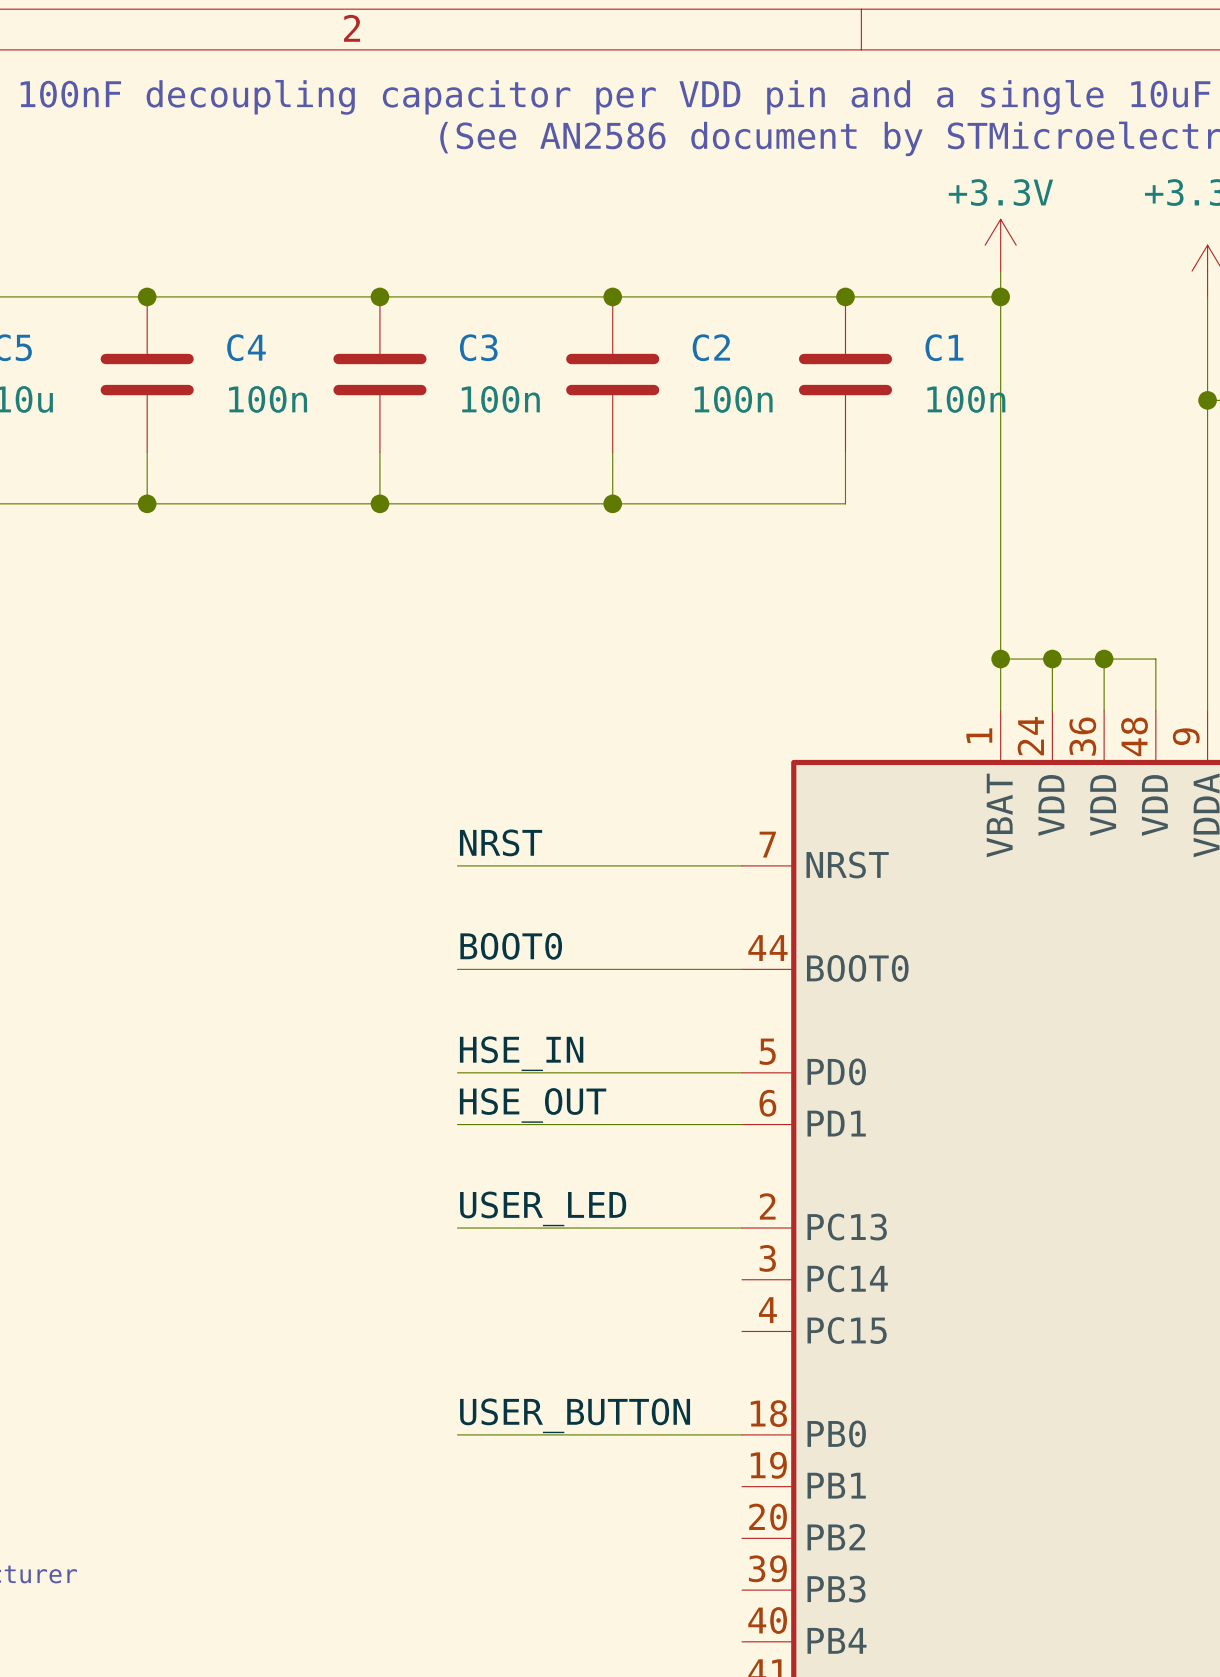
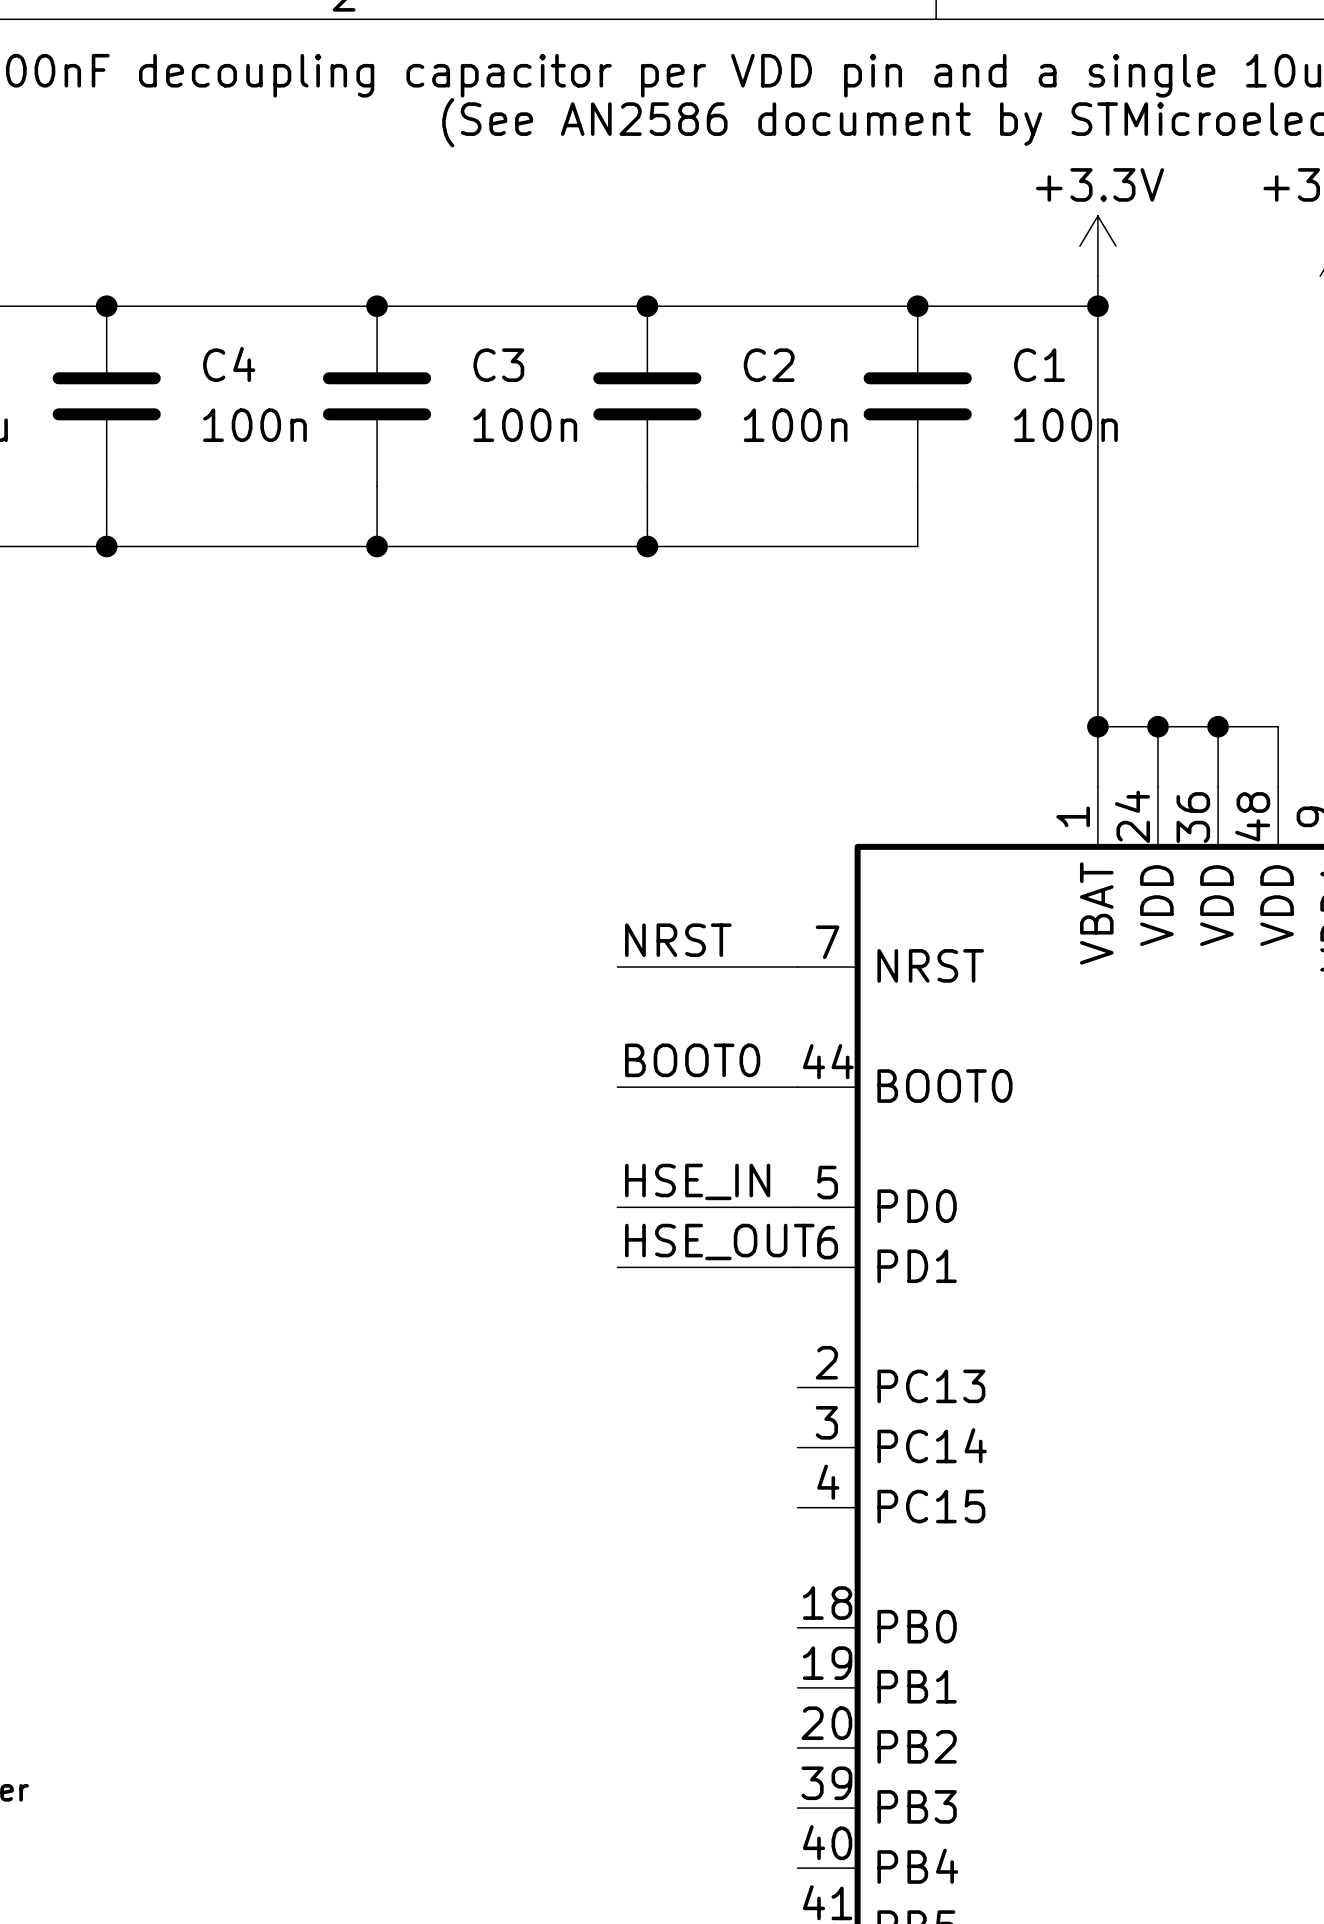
label position: NRST (501, 842) -> NRST (678, 940)
wire: (457, 865) (586, 865) -> none
label position: BOOT0 (511, 946) -> BOOT0 (692, 1060)
wire: (457, 969) (586, 969) -> none
label position: HSE_IN (521, 1053) -> HSE_IN (697, 1181)
wire: (457, 1072) (586, 1072) -> none
label position: HSE_OUT (533, 1105) -> HSE_OUT (719, 1242)
wire: (457, 1124) (586, 1124) -> none
label: USER_LED (543, 1208) -> none
wire: (457, 1228) (742, 1228) -> none
label: USER_BUTTON (575, 1415) -> none
wire: (457, 1434) (742, 1434) -> none

